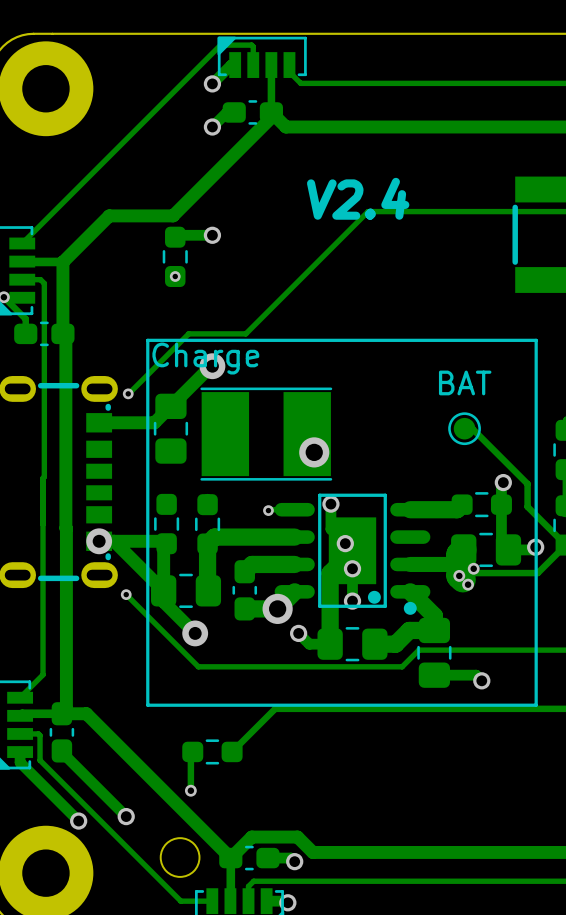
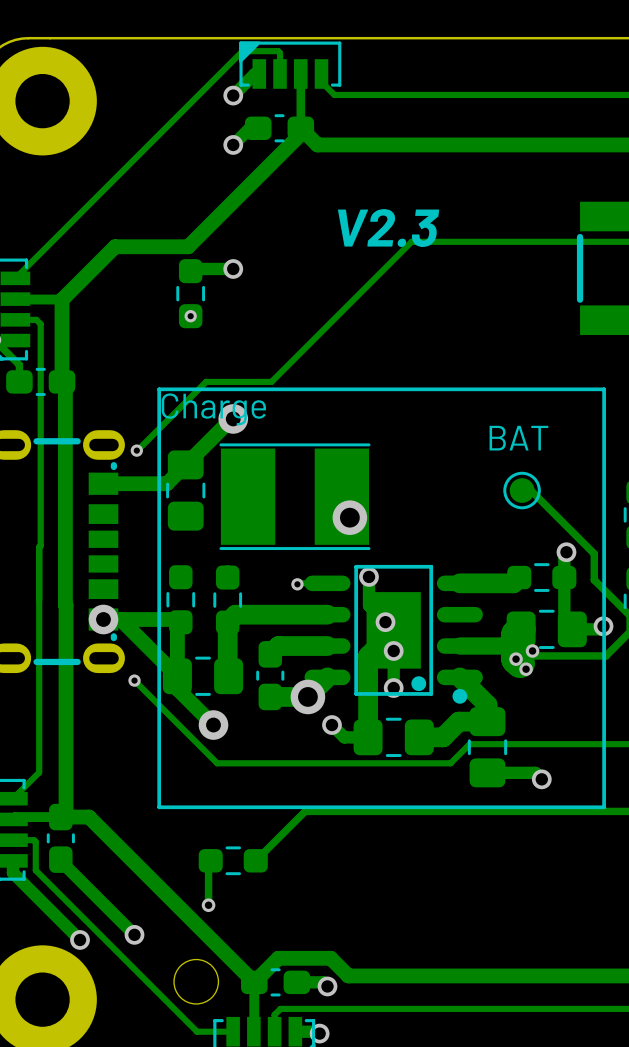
text: V2.4 (358, 198) -> V2.3 (388, 228)

